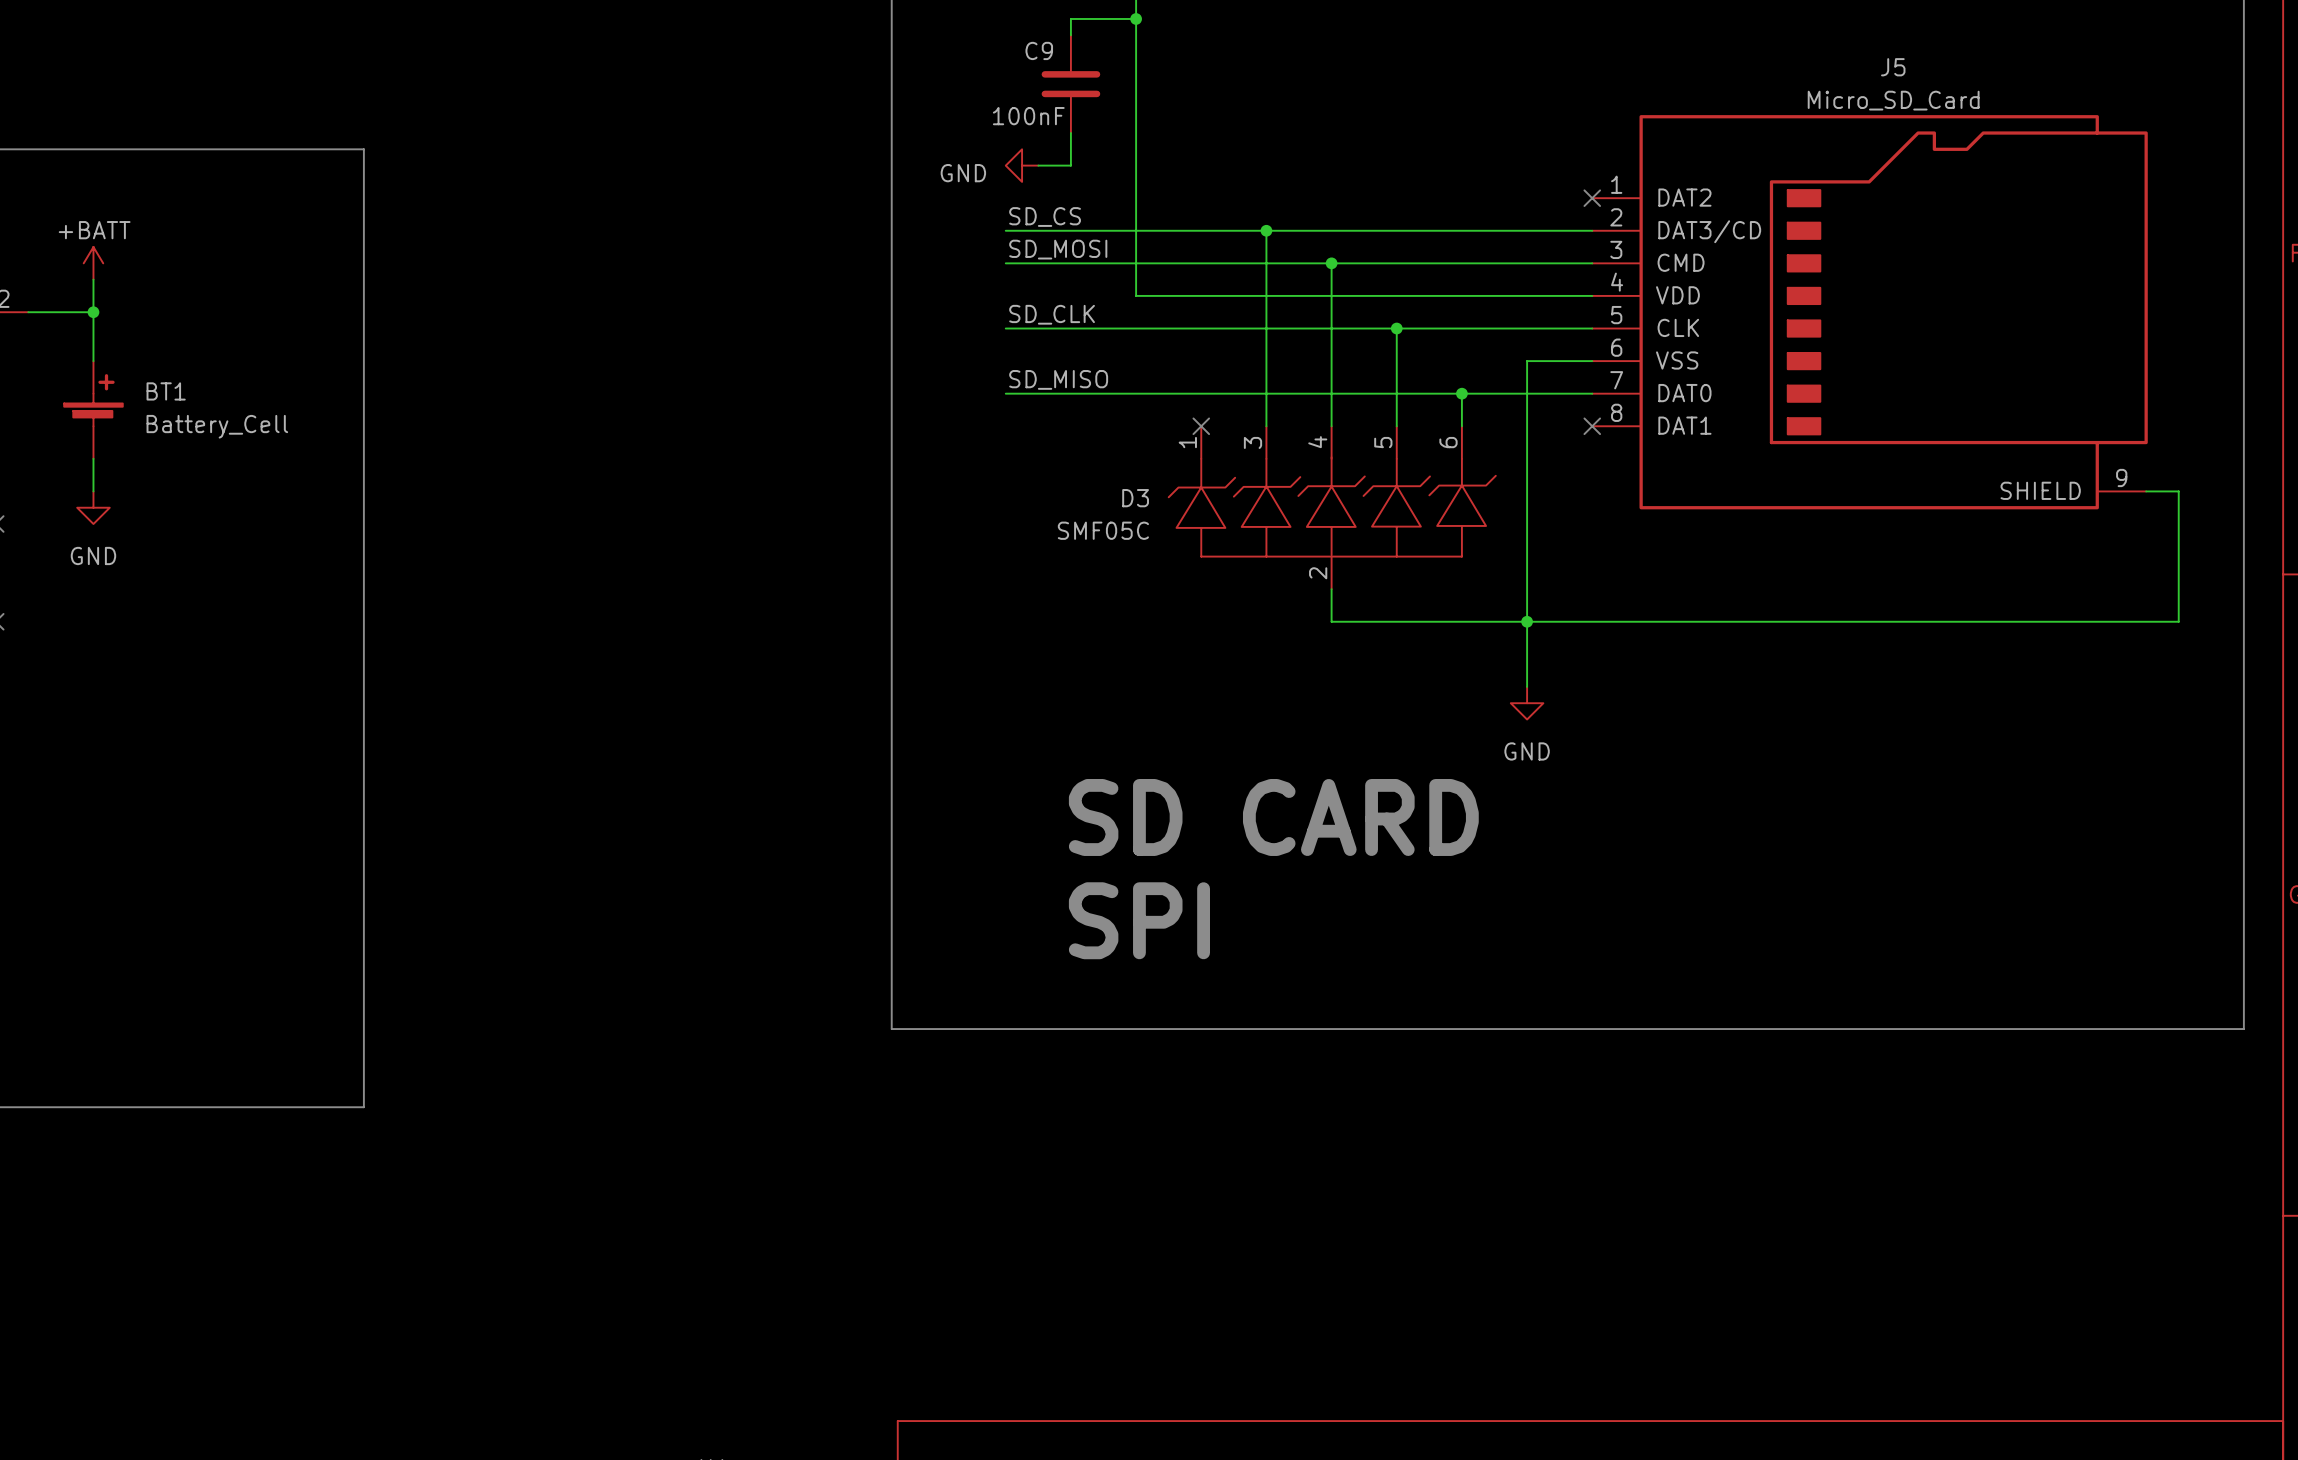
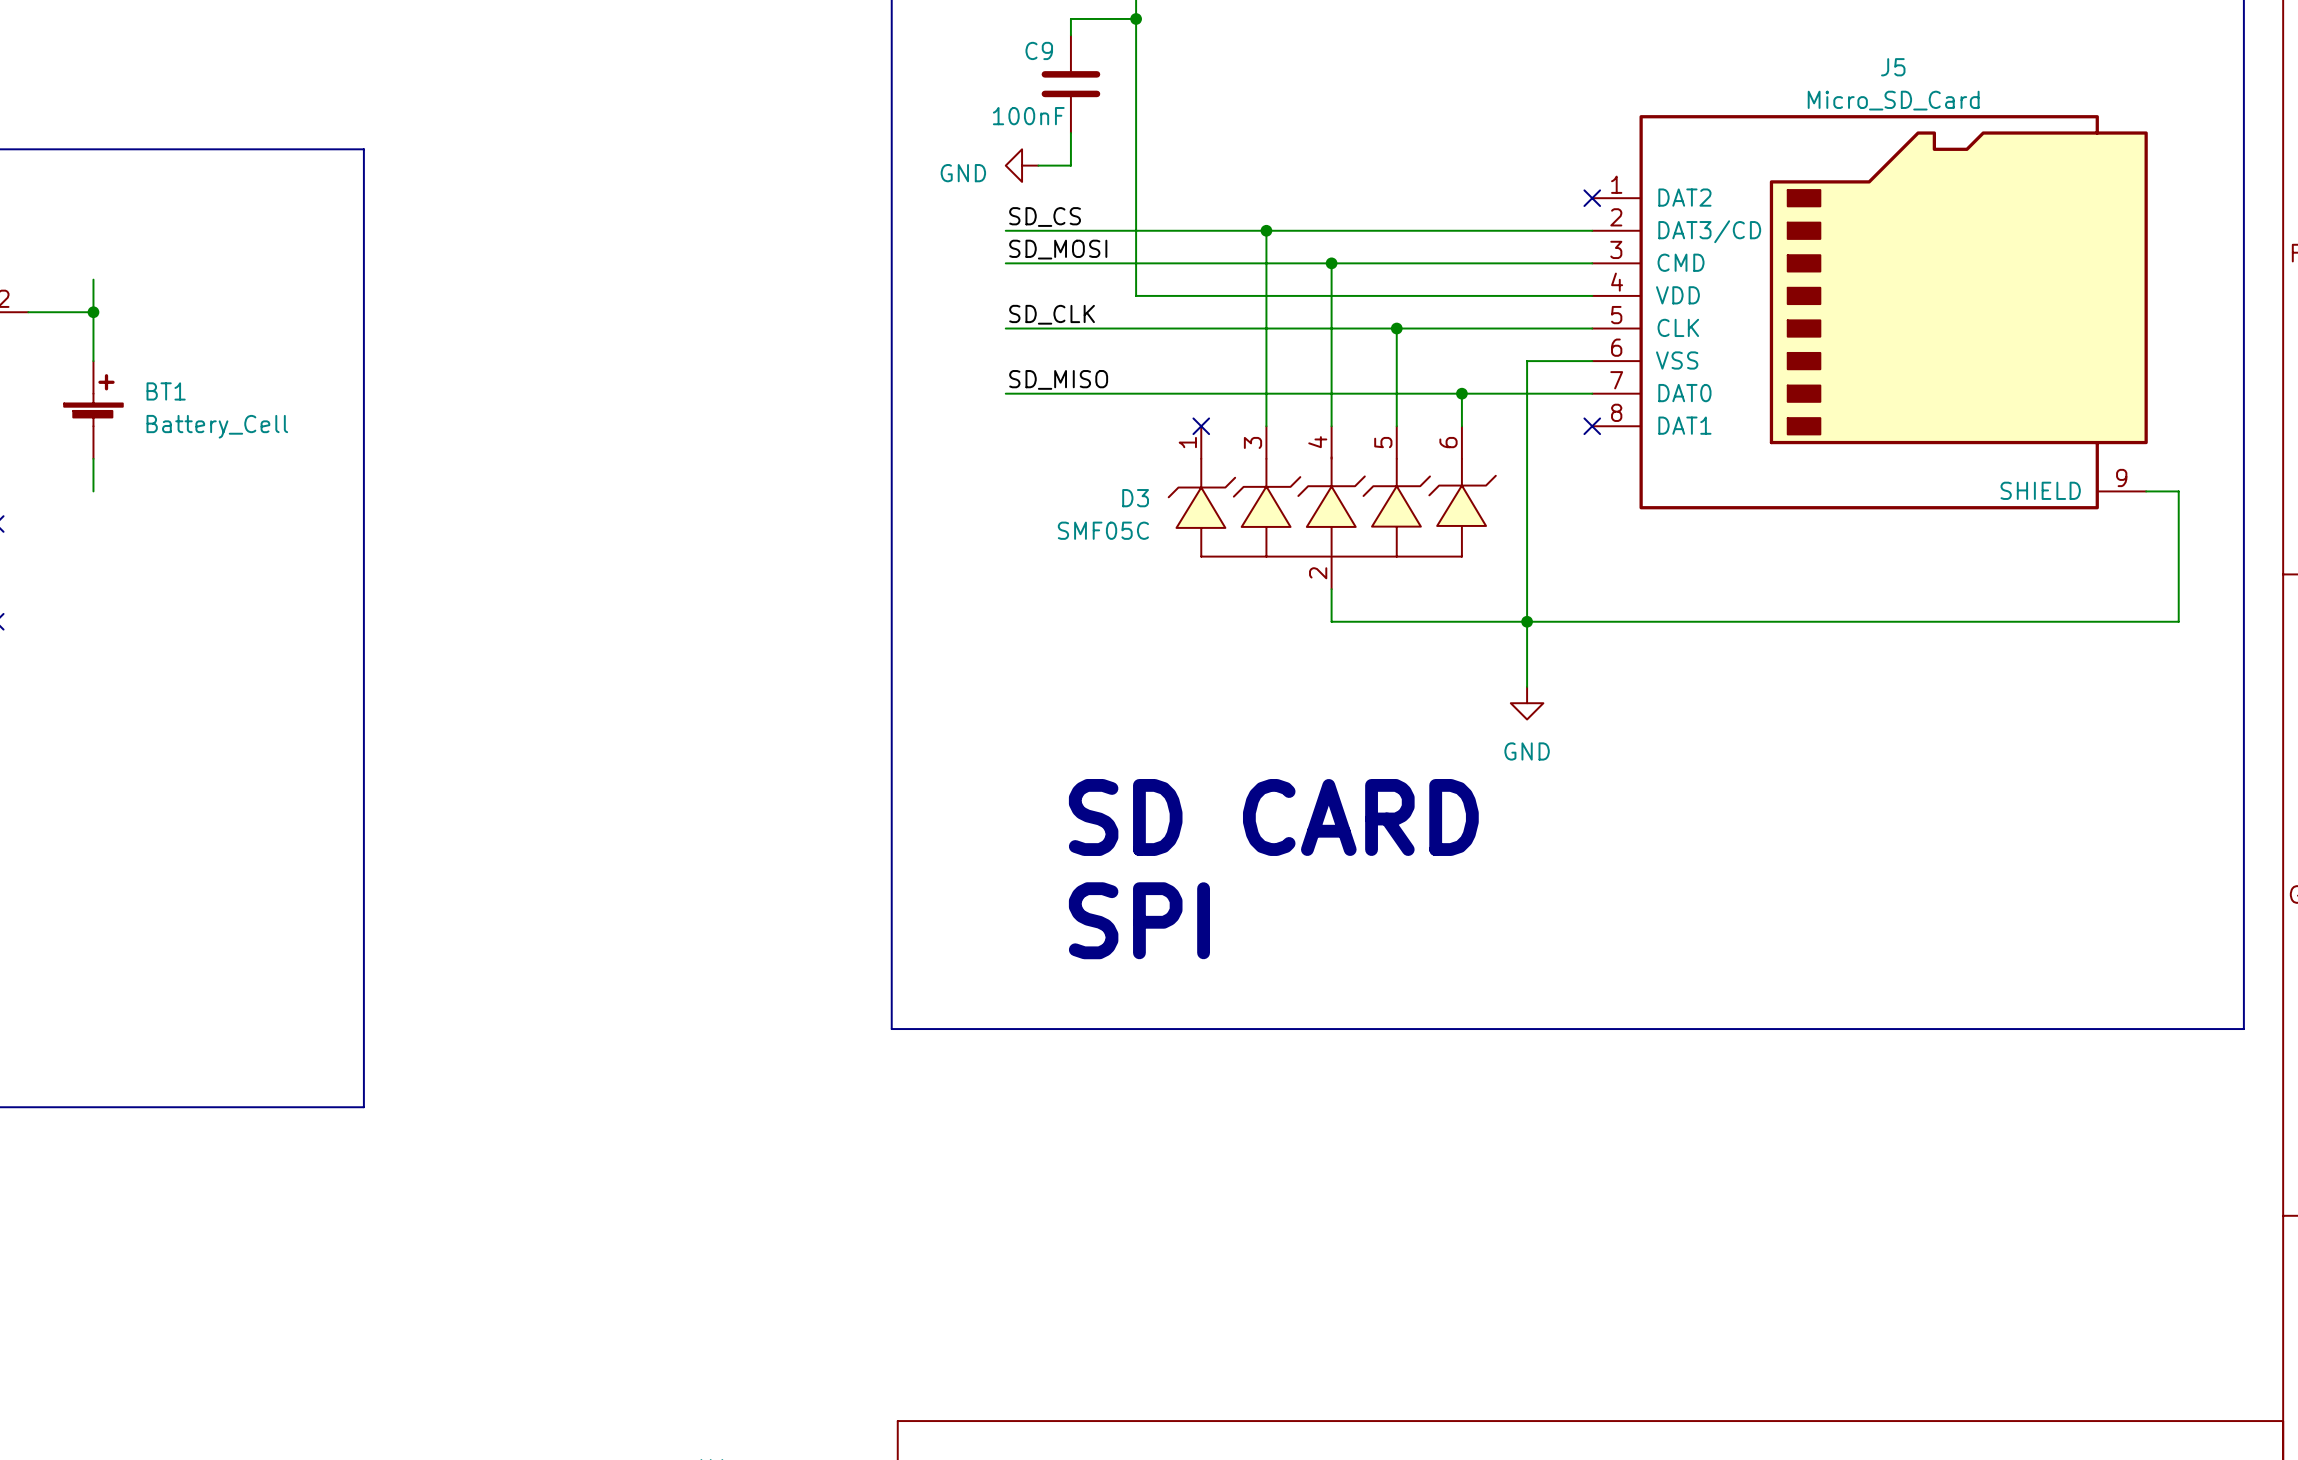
power symbol: +BATT (93, 263) -> none
power symbol: GND (93, 507) -> none

